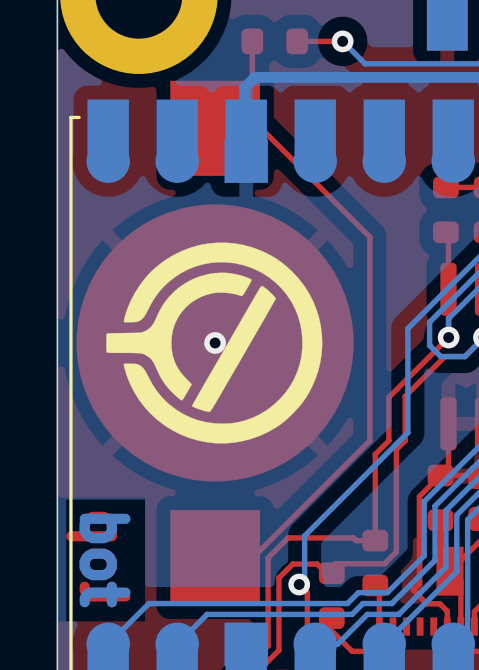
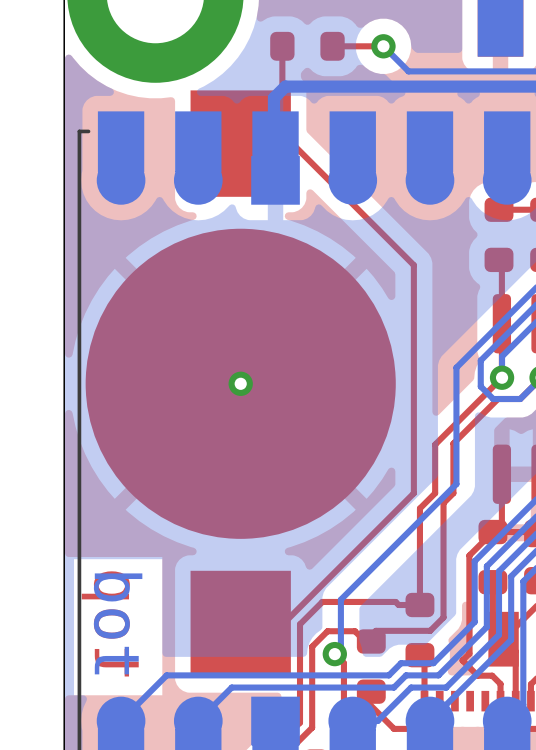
drawing: [106, 242, 323, 444] -> none

